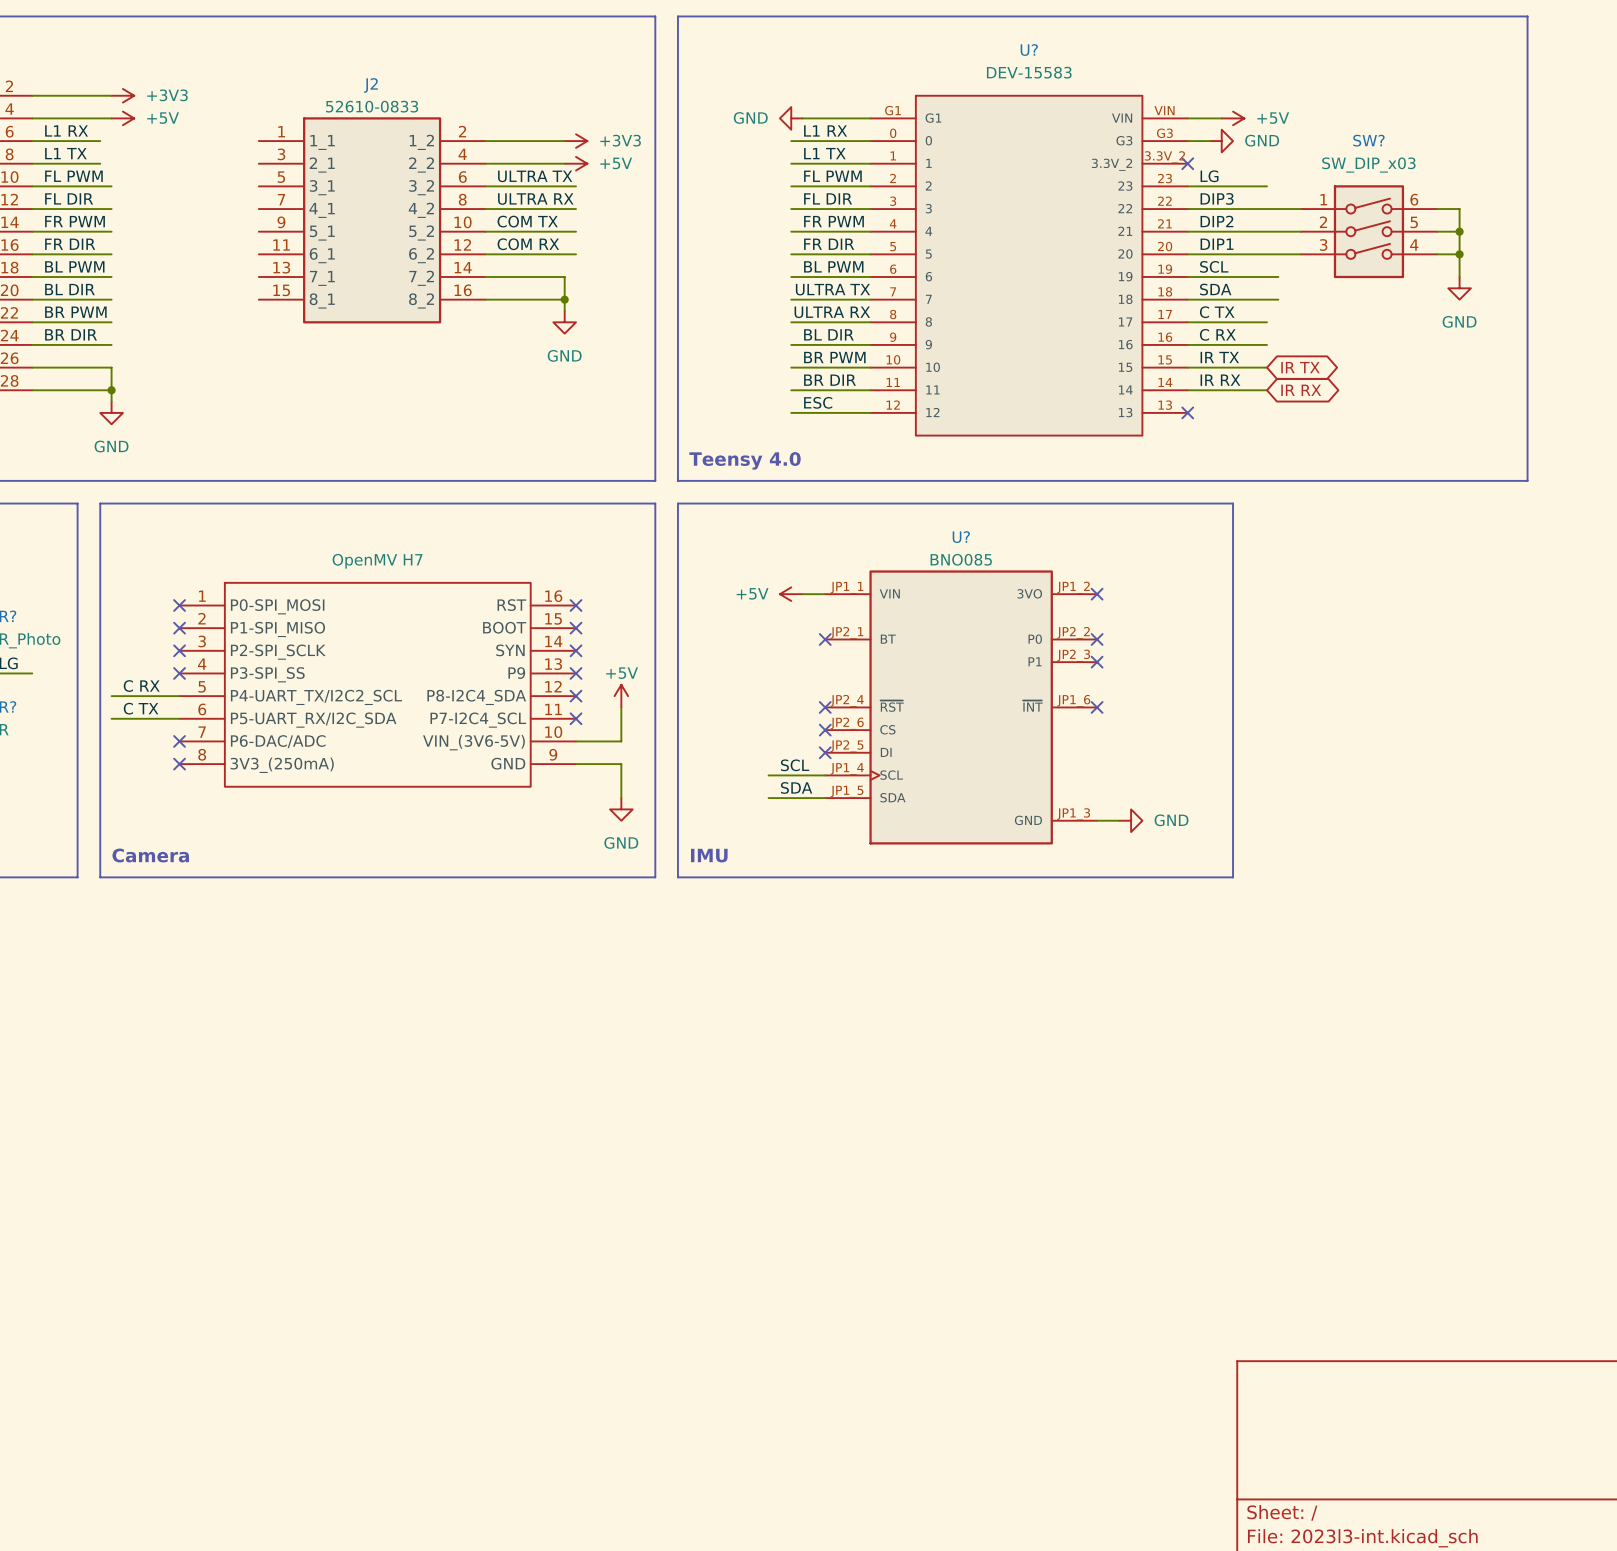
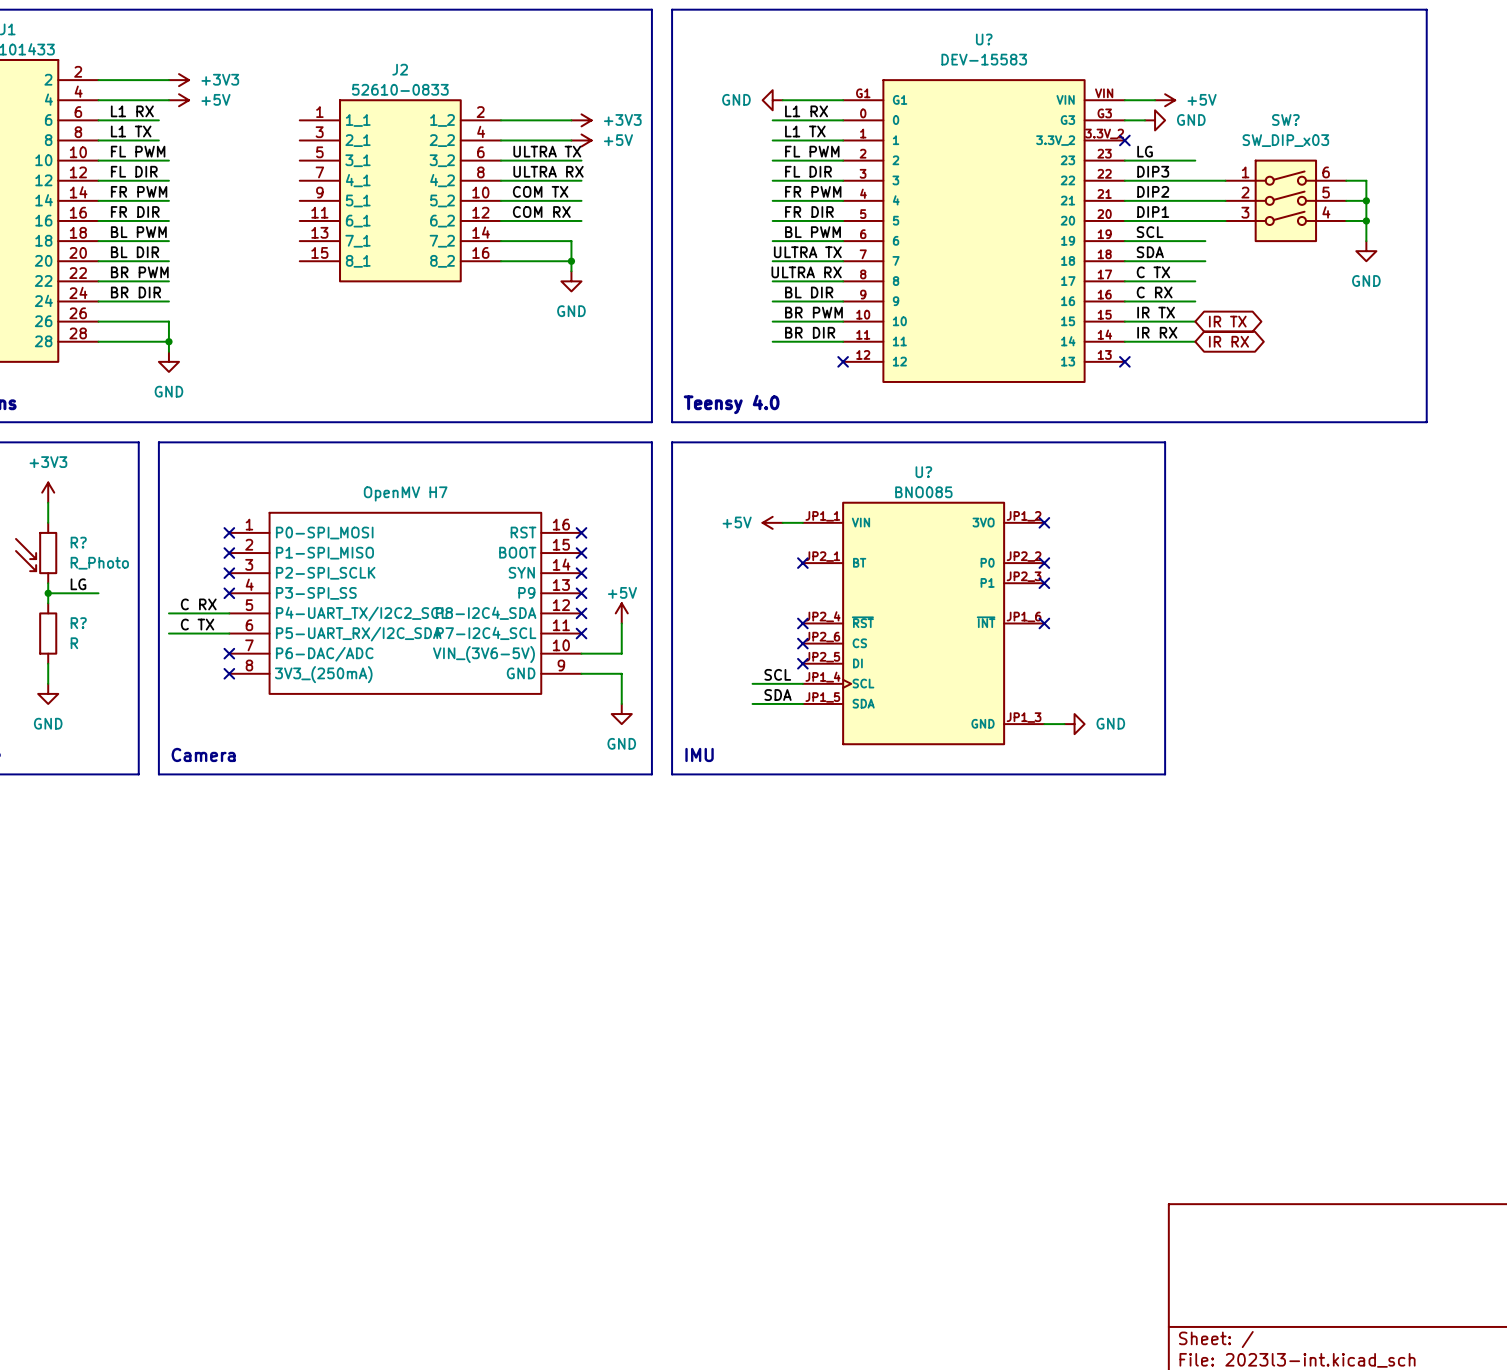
label: ESC (818, 402) -> none
wire: (791, 412) (870, 412) -> none
no-connect mark: none -> (843, 361)

